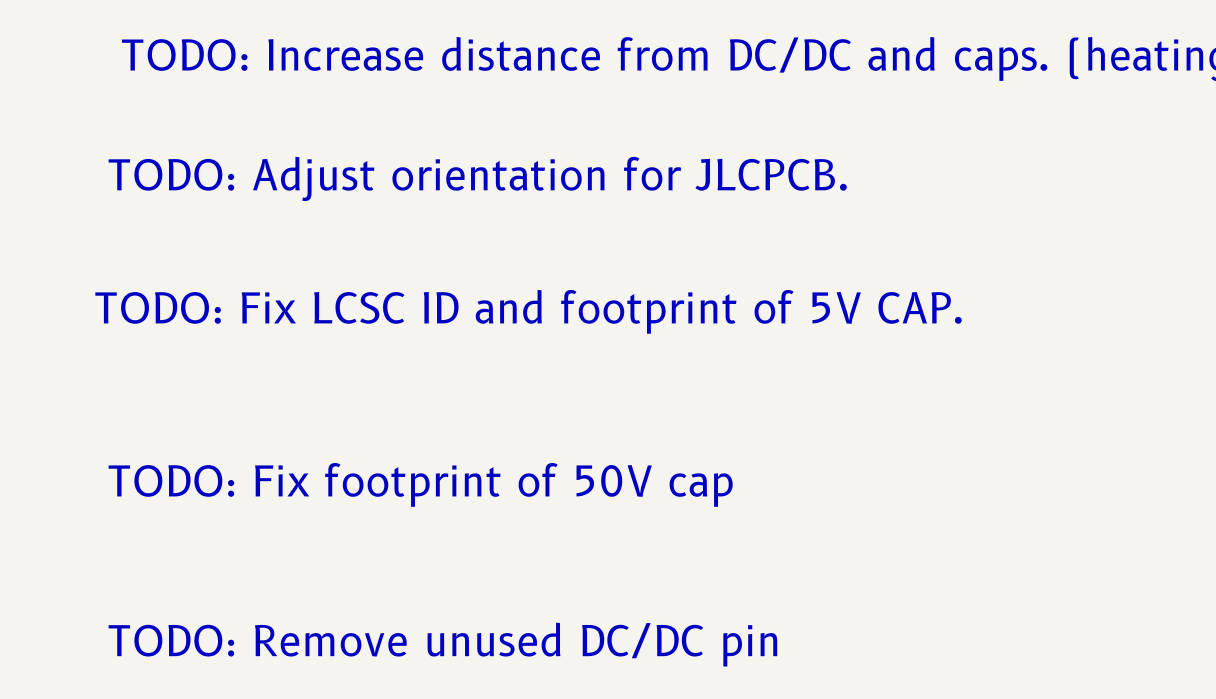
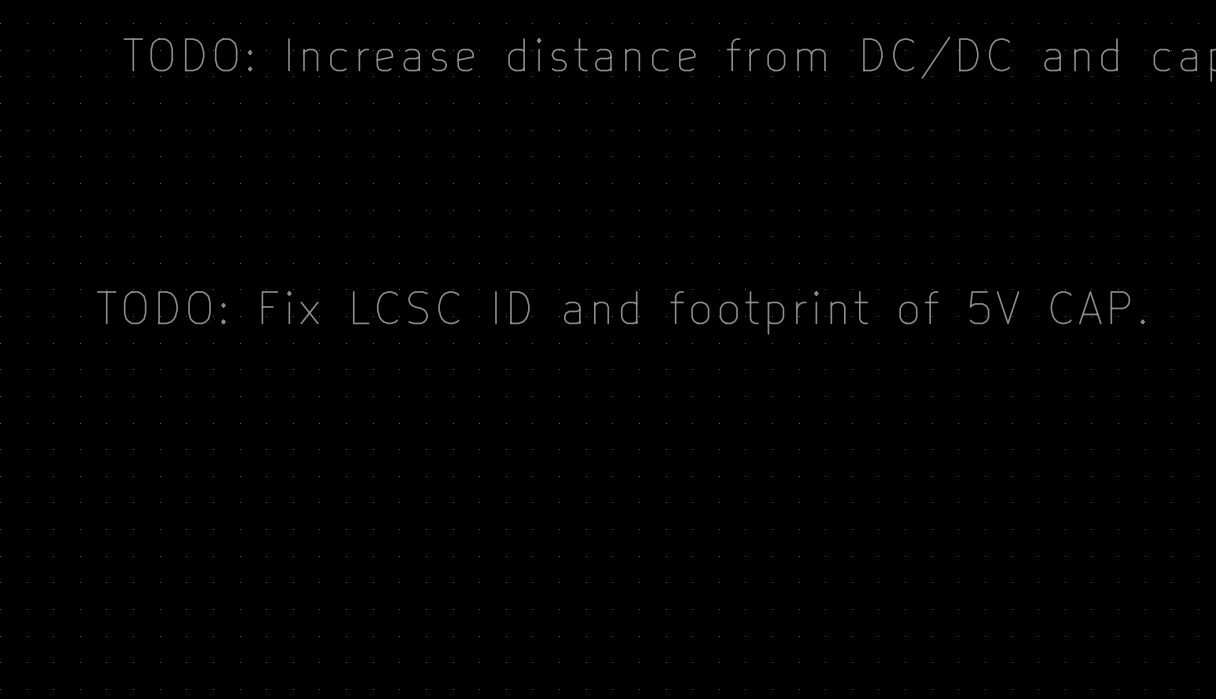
text: TODO: Adjust orientation for JLCPCB. (477, 178) -> none
text: TODO: Fix footprint of 50V cap (420, 484) -> none
text: TODO: Remove unused DC/DC pin (442, 644) -> none

